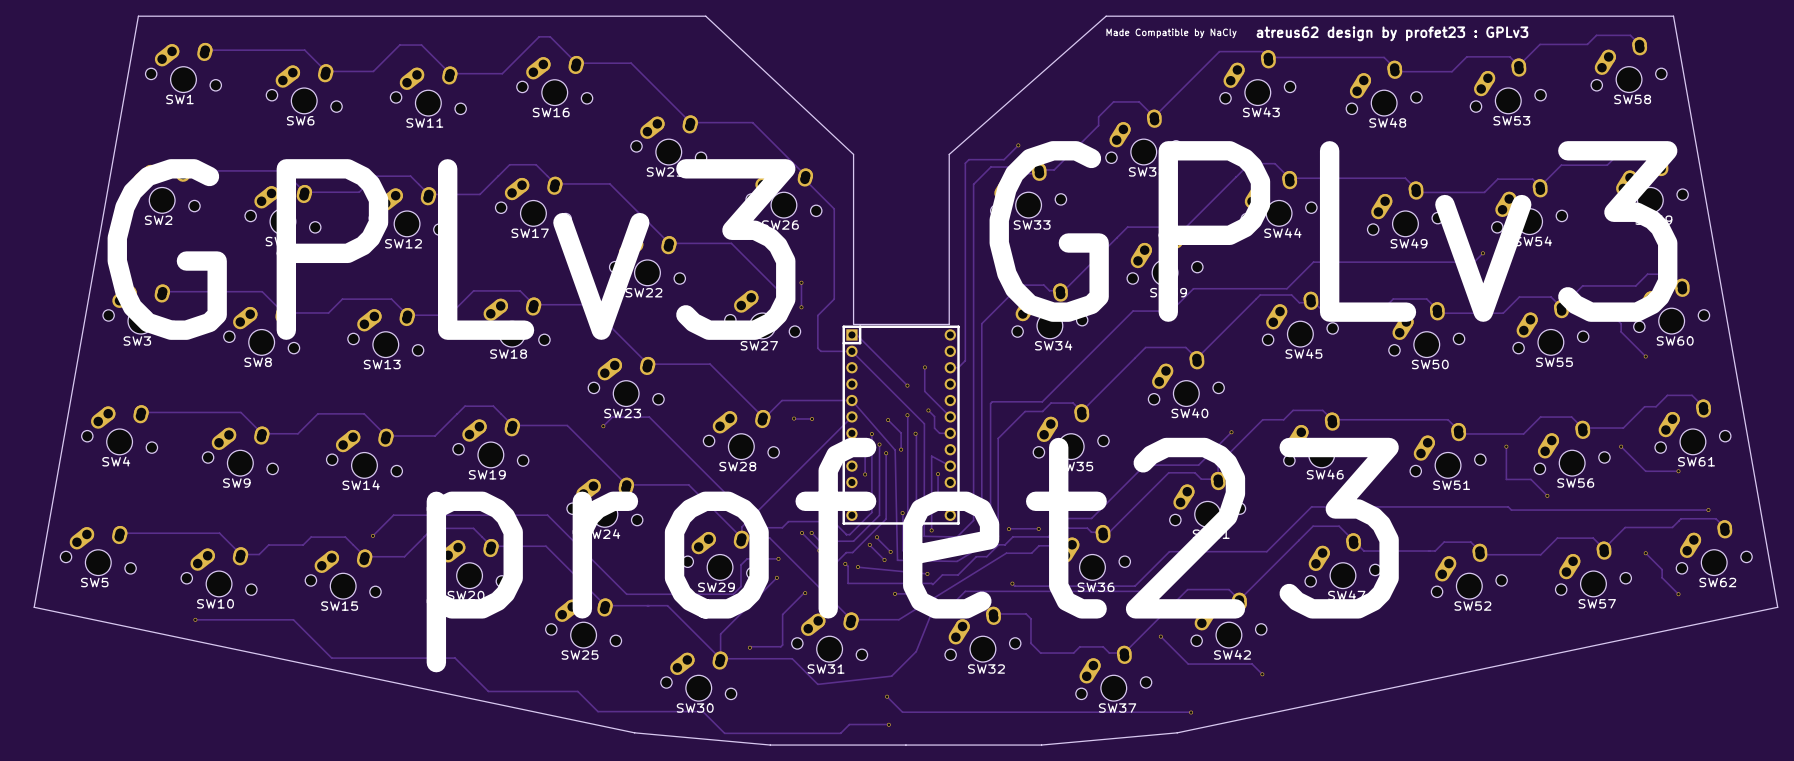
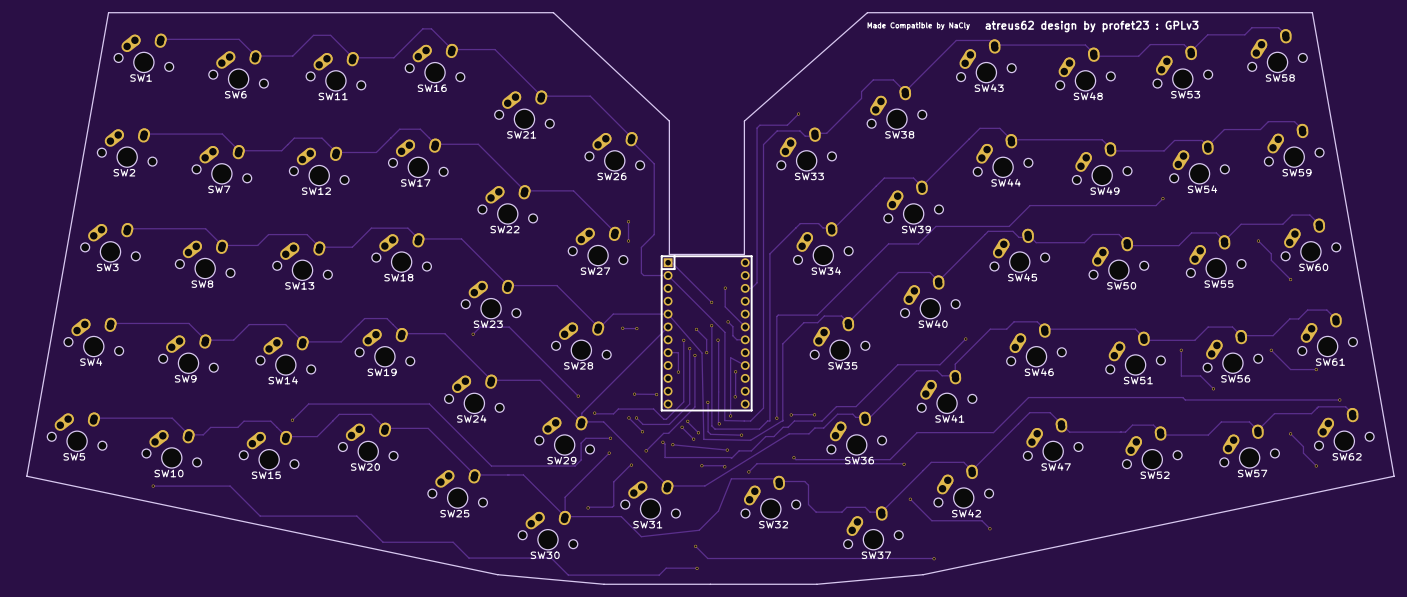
text: GPLv3 (1333, 231) -> none
text: GPLv3 (451, 249) -> none
text: profet23 (912, 555) -> none

